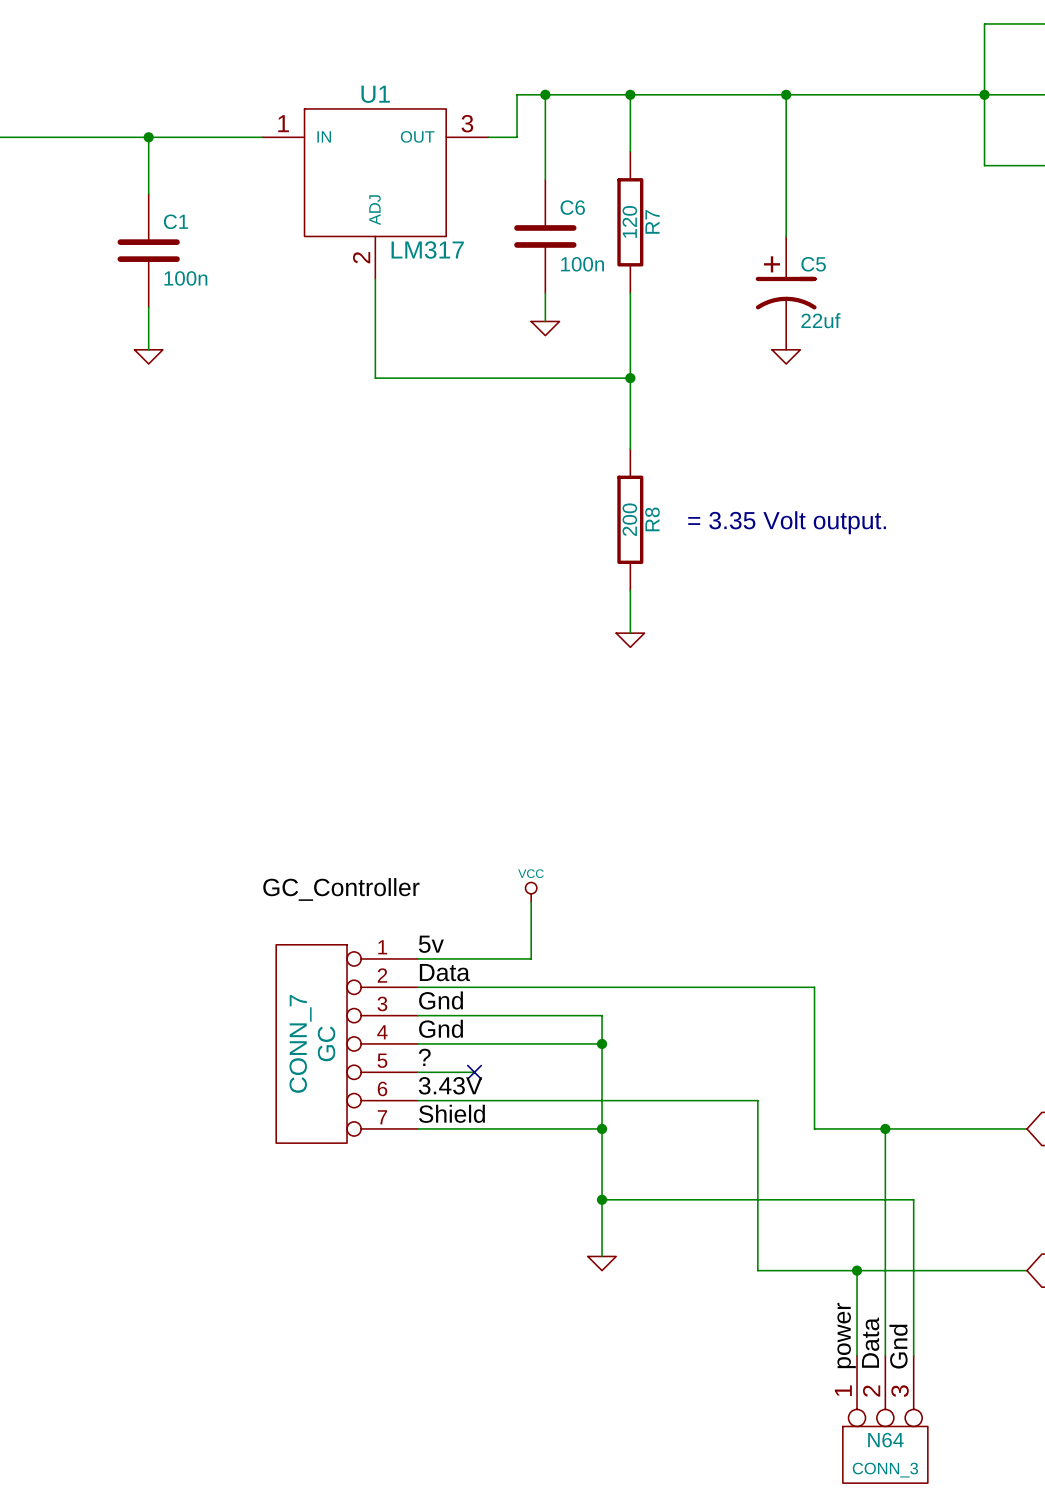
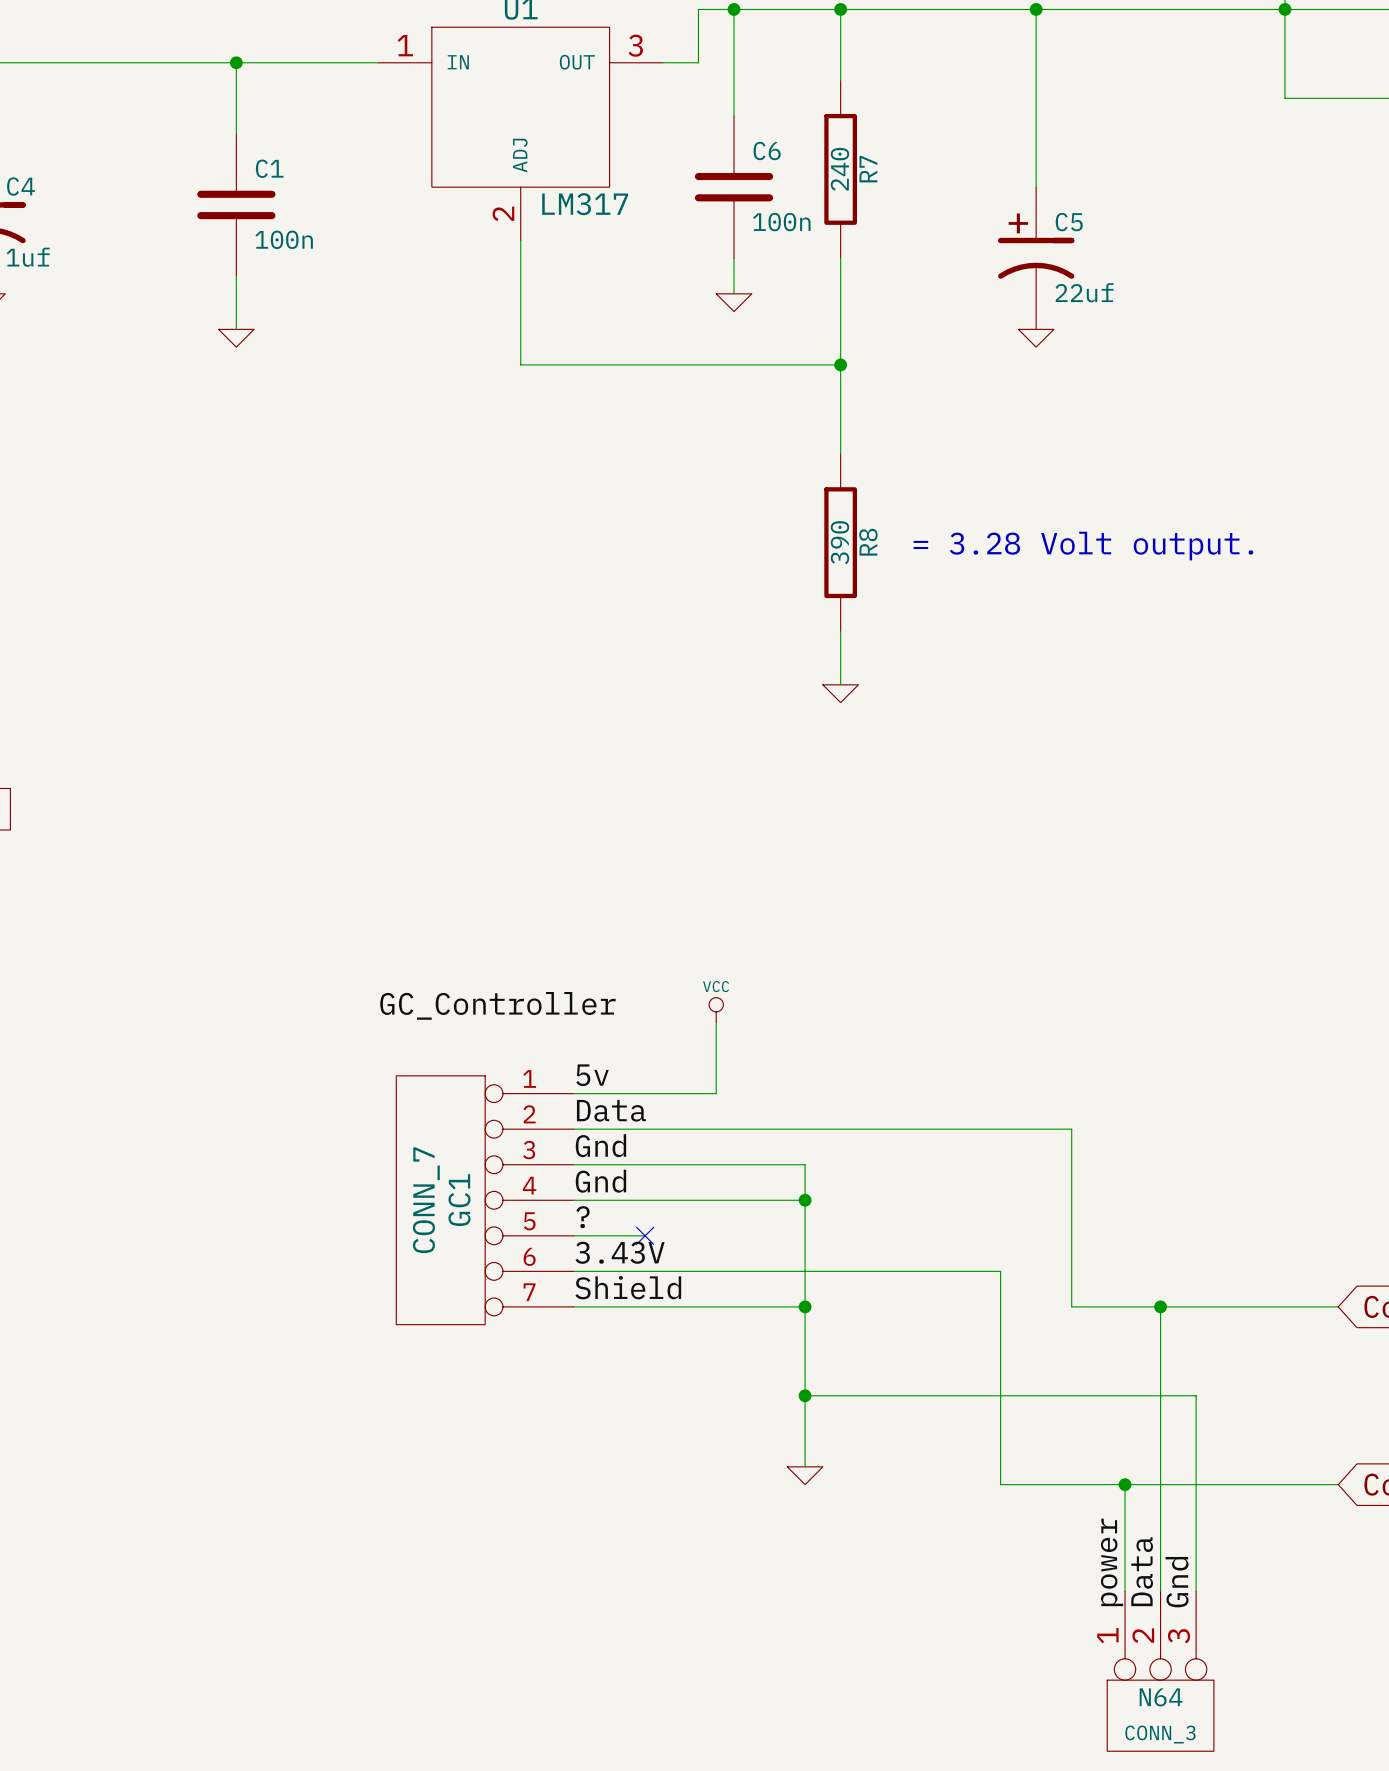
R7 value: 120 (629, 221) -> 240 (839, 169)
R8 value: 200 (629, 519) -> 390 (839, 542)
text: = 3.35 Volt output. (787, 522) -> = 3.28 Volt output. (1083, 546)
GC name: GC (326, 1043) -> GC1 (459, 1200)

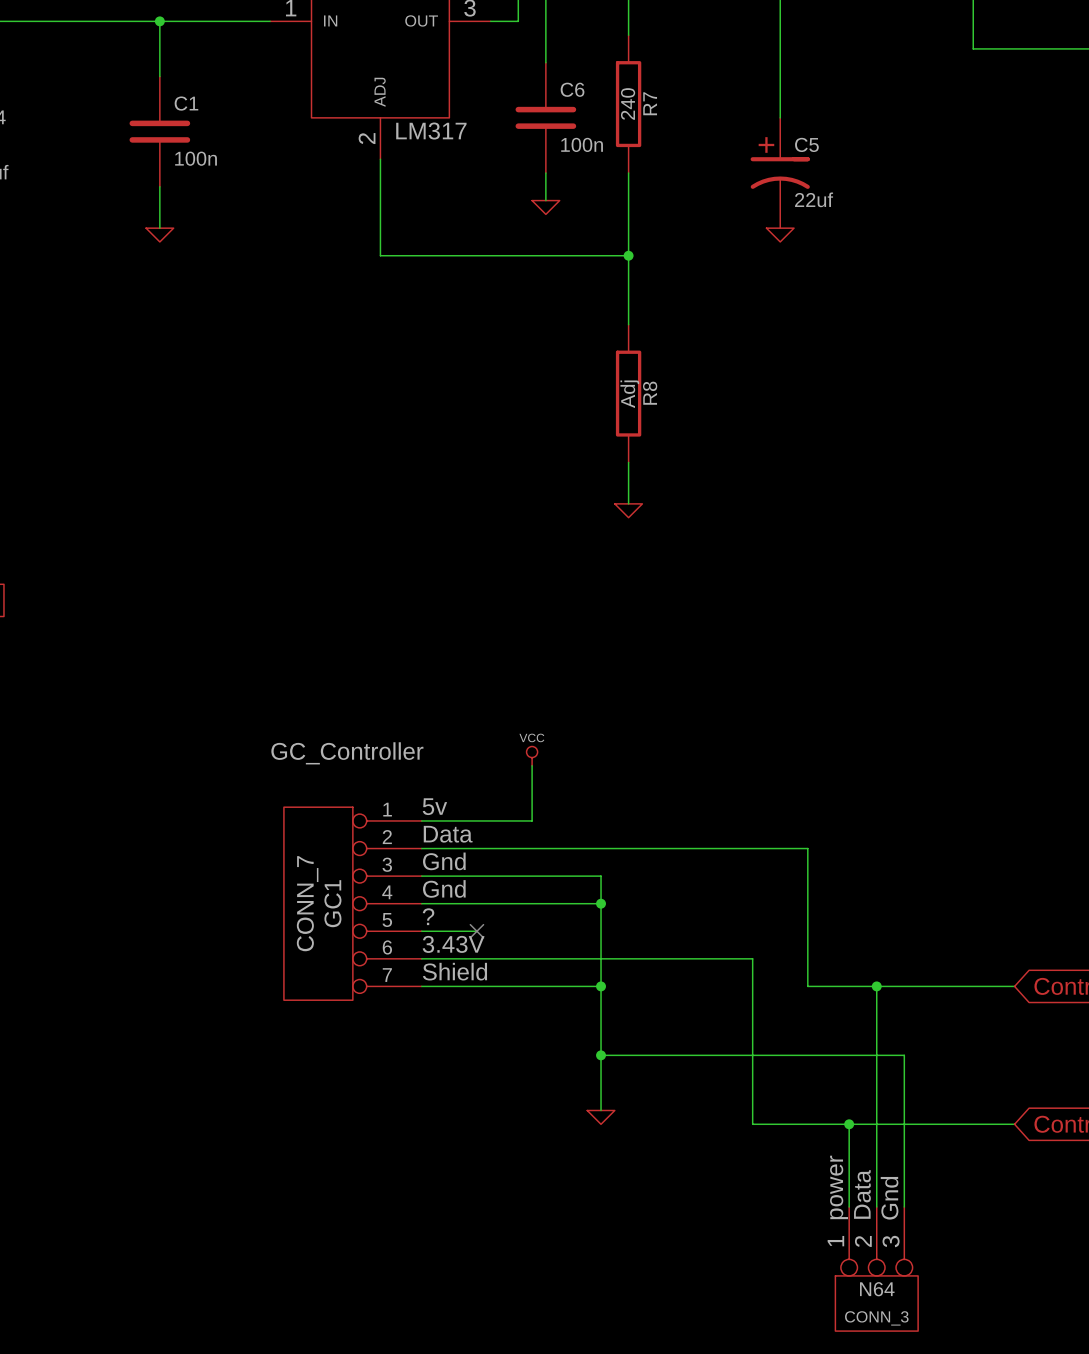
R8 value: 390 (839, 542) -> Adj (629, 394)
text: = 3.28 Volt output. (1083, 546) -> none

